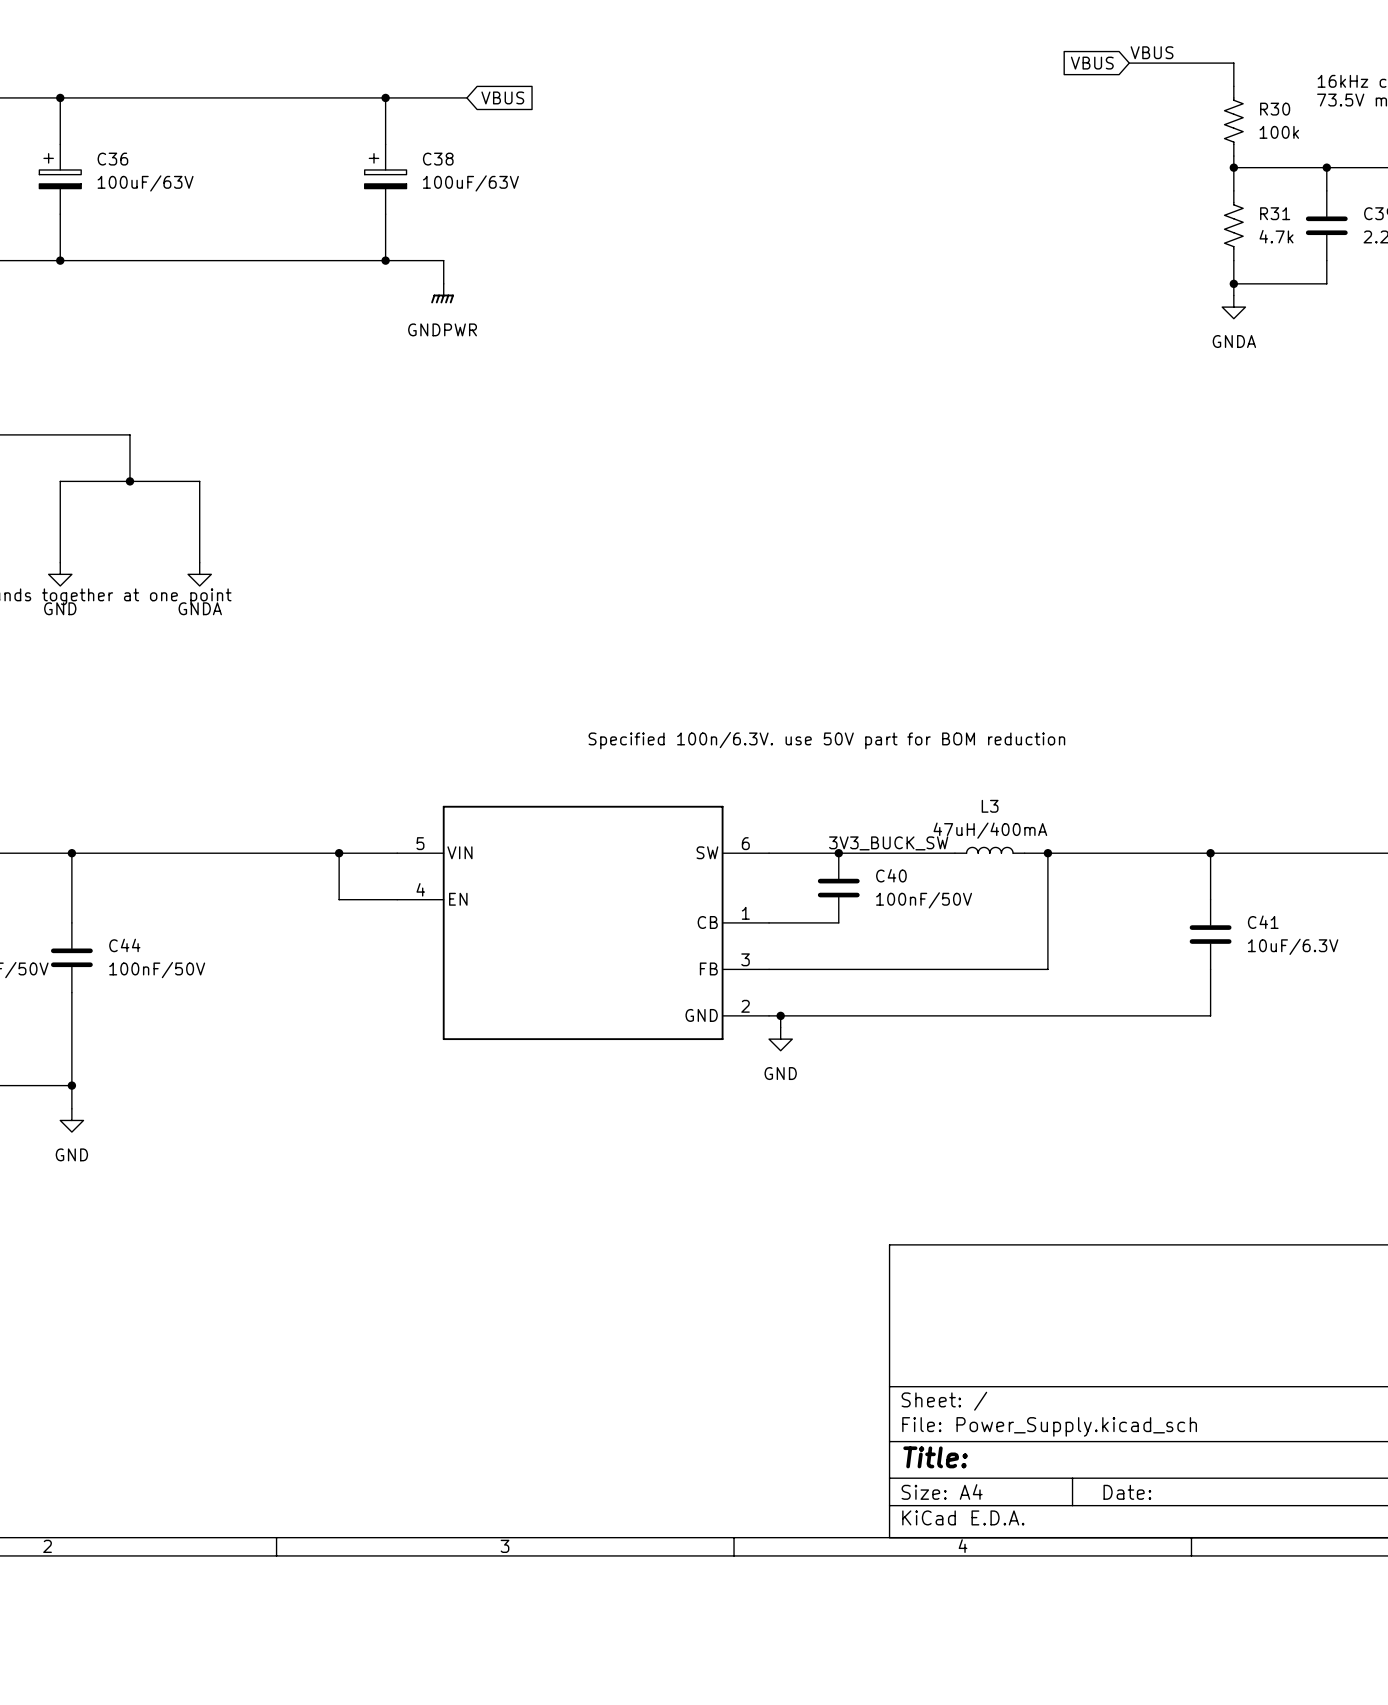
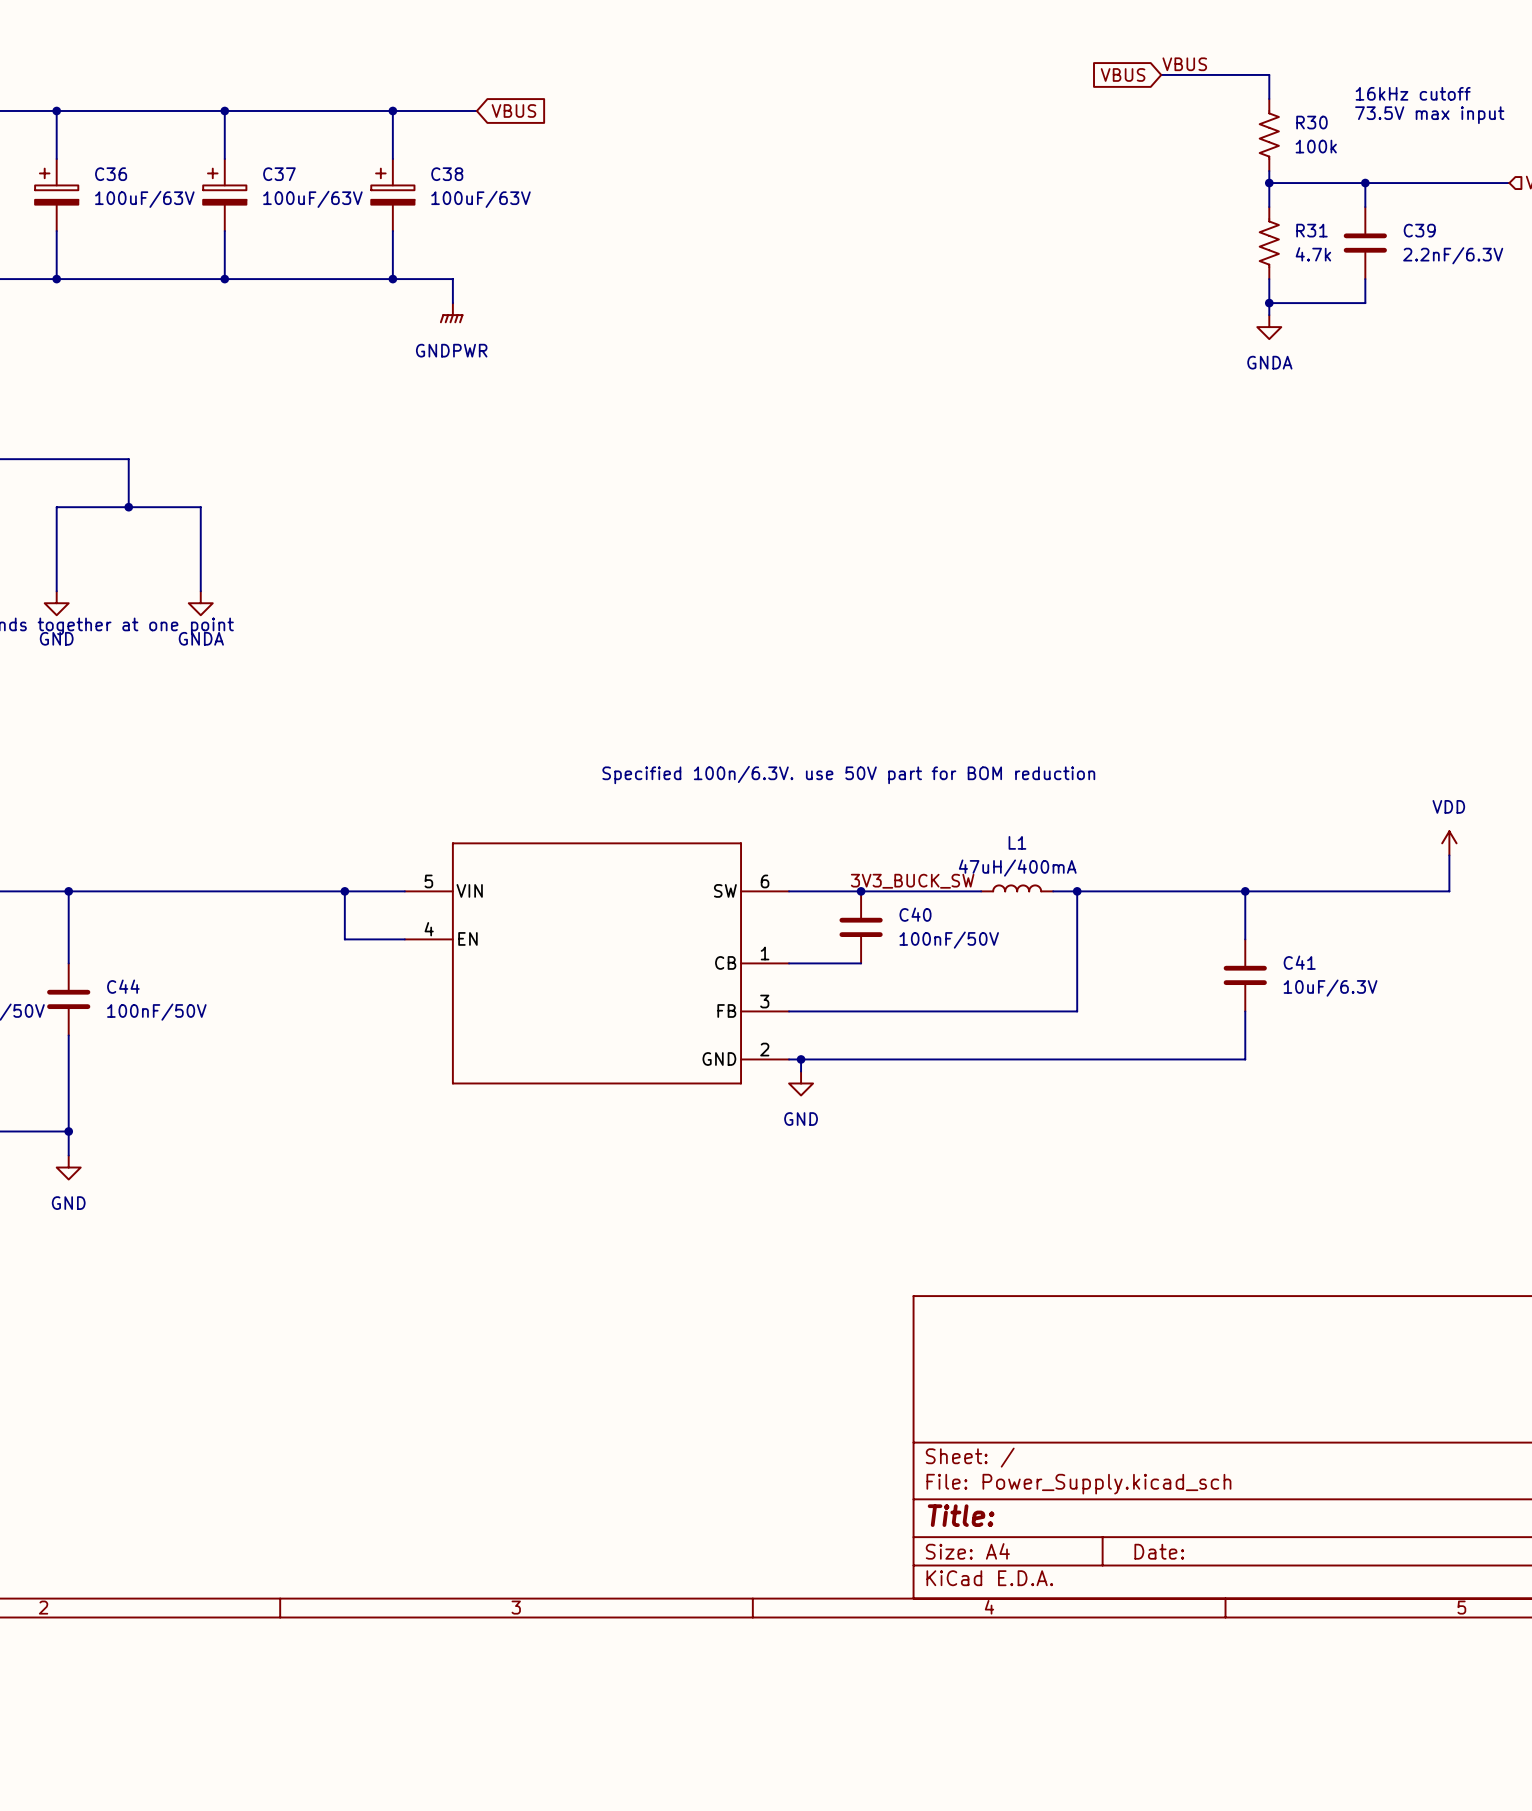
wire: none -> (224, 110) (224, 159)
junction: none -> (224, 110)
C37: none -> 100uF/63V (224, 195)
wire: none -> (224, 231) (224, 279)
junction: none -> (224, 279)
L3 name: L3 (990, 806) -> L1 (1017, 842)

